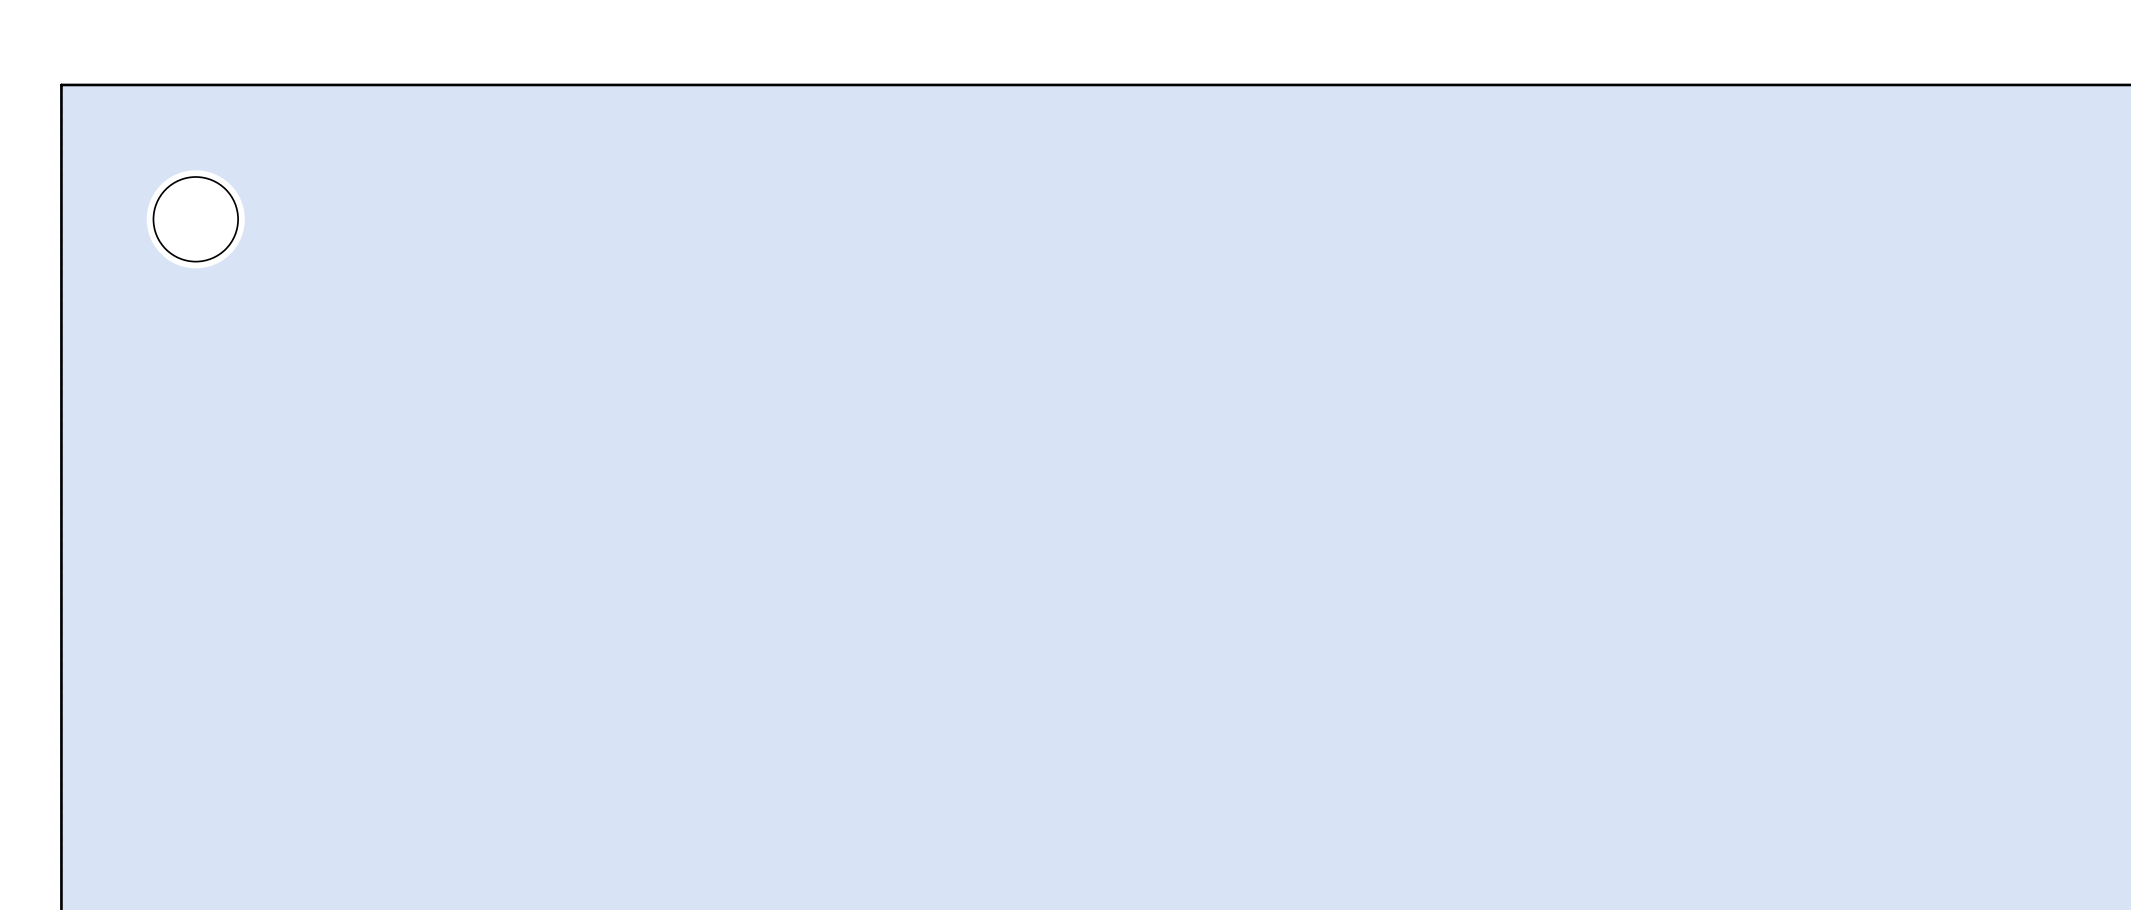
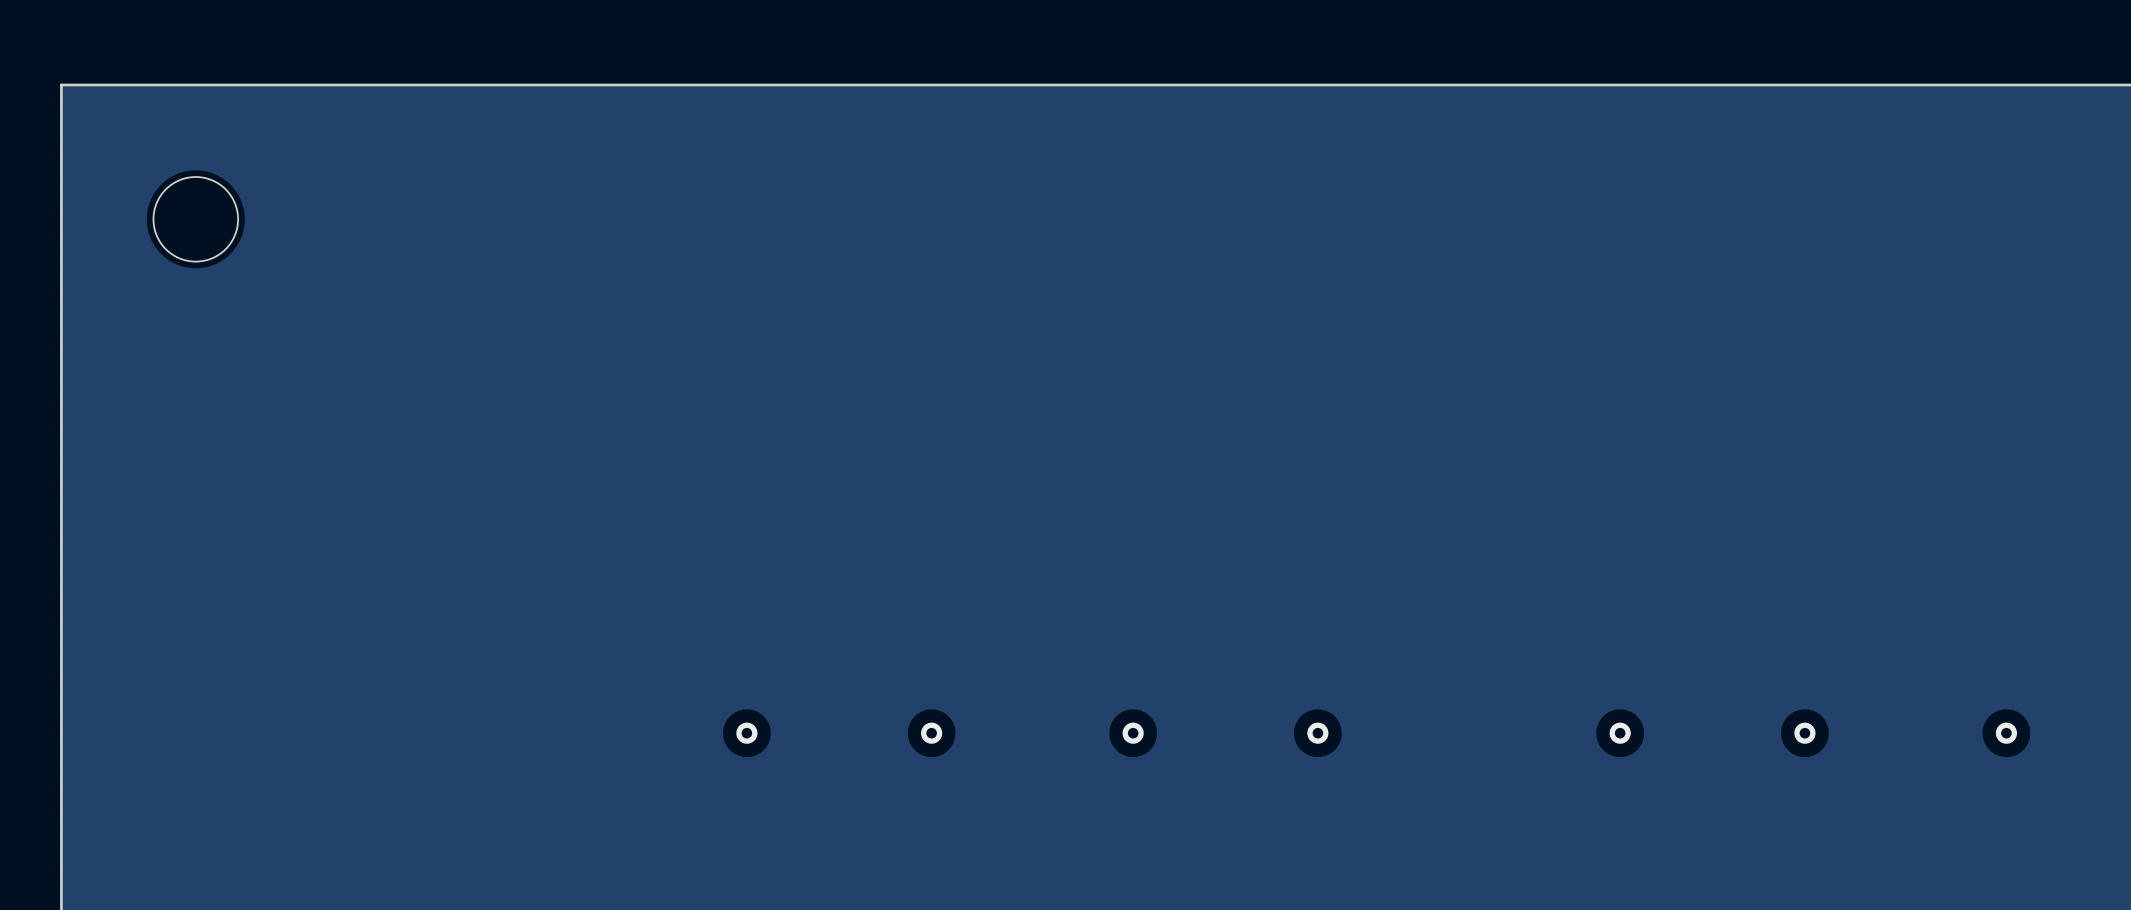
via: none -> (746, 733)
via: none -> (931, 733)
via: none -> (1133, 733)
via: none -> (1317, 733)
via: none -> (1620, 733)
via: none -> (1804, 733)
via: none -> (2006, 733)

